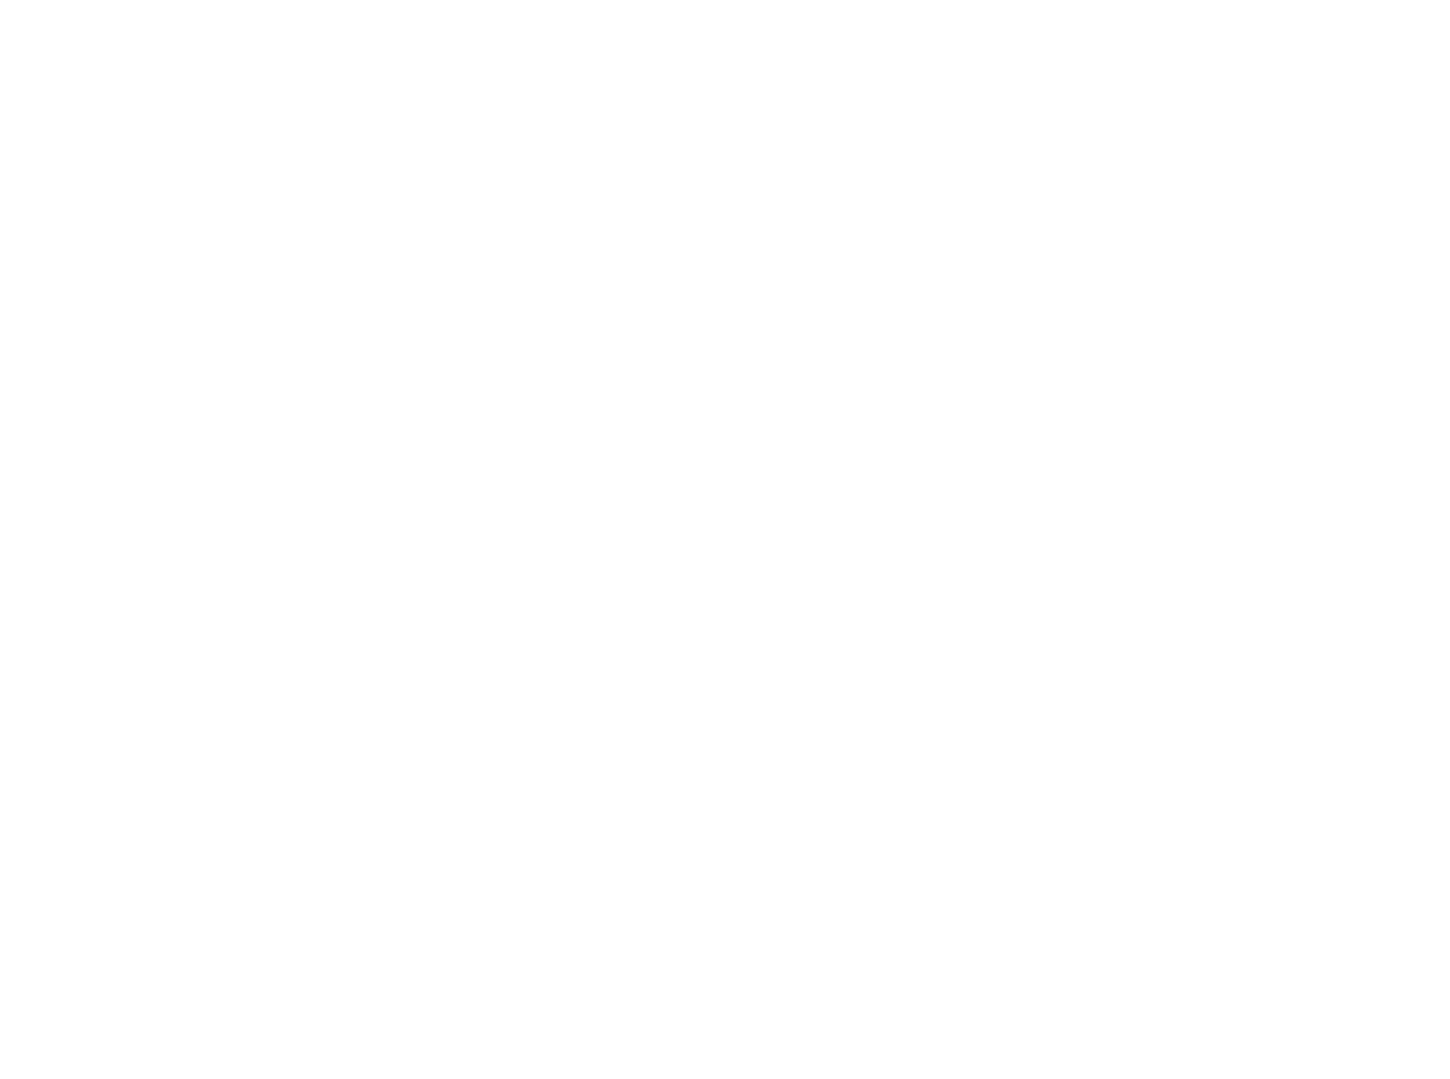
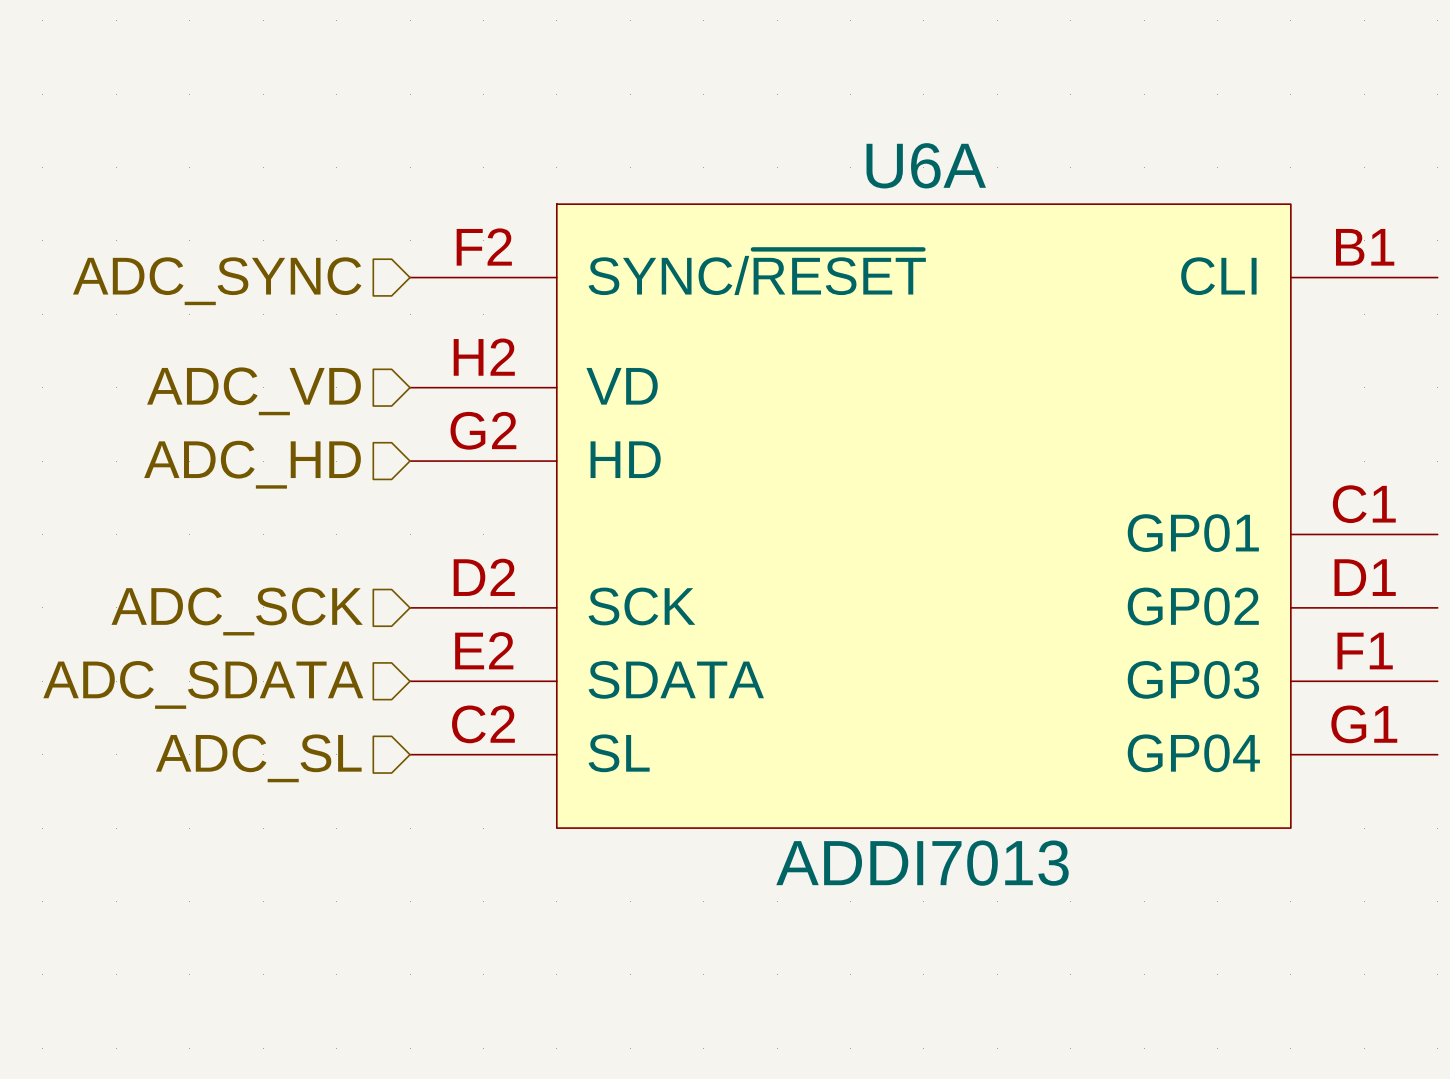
hierarchical label: none -> ADC_SYNC (217, 281)
hierarchical label: none -> ADC_VD (253, 391)
hierarchical label: none -> ADC_HD (252, 464)
U6A: none -> ADDI7013 (923, 516)
hierarchical label: none -> ADC_SCK (237, 611)
hierarchical label: none -> ADC_SDATA (203, 684)
hierarchical label: none -> ADC_SL (258, 758)

